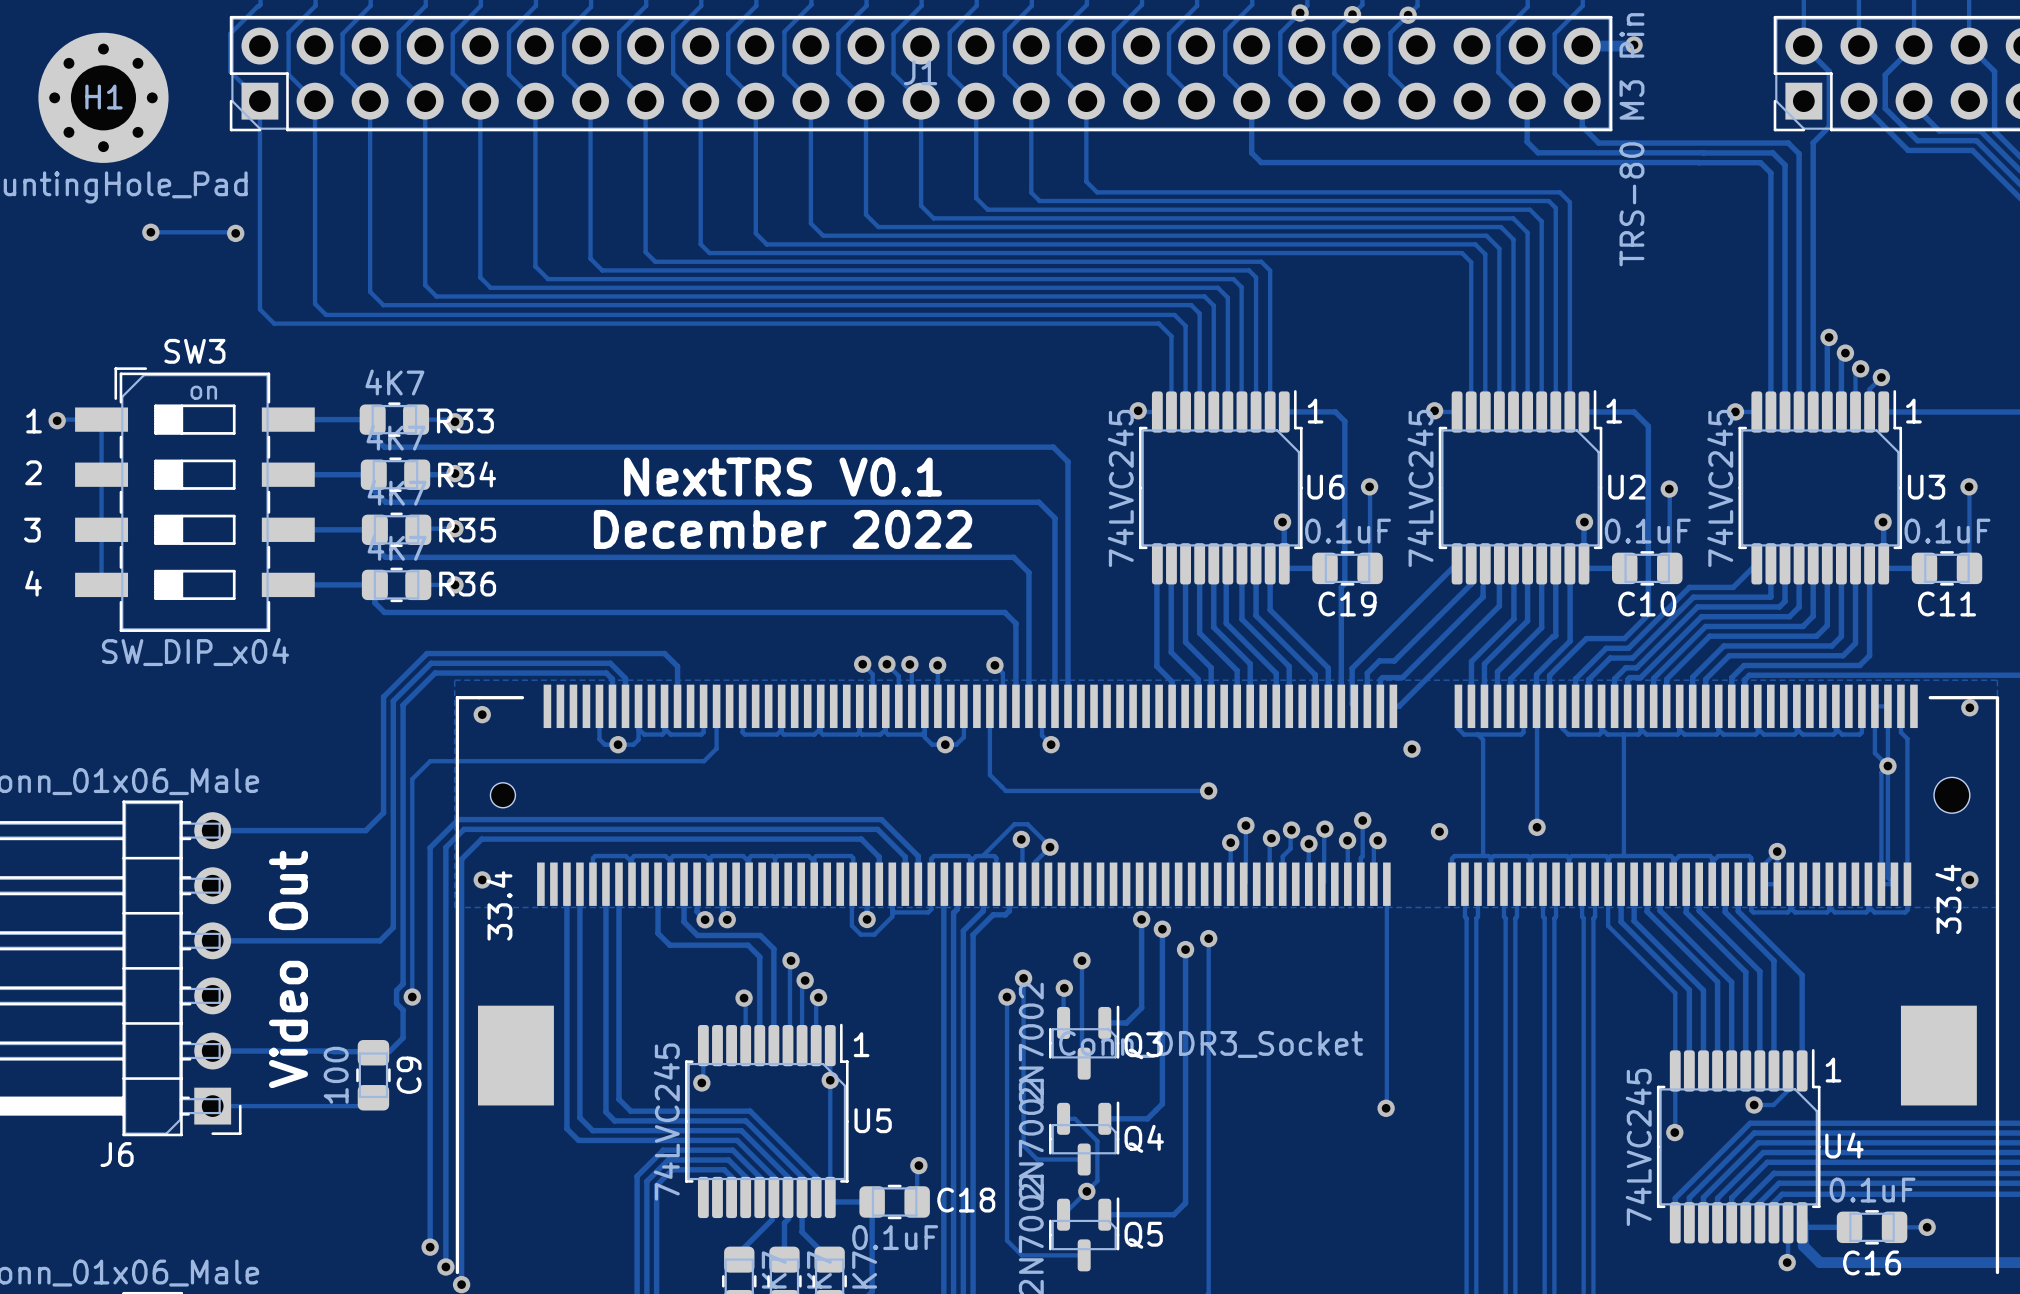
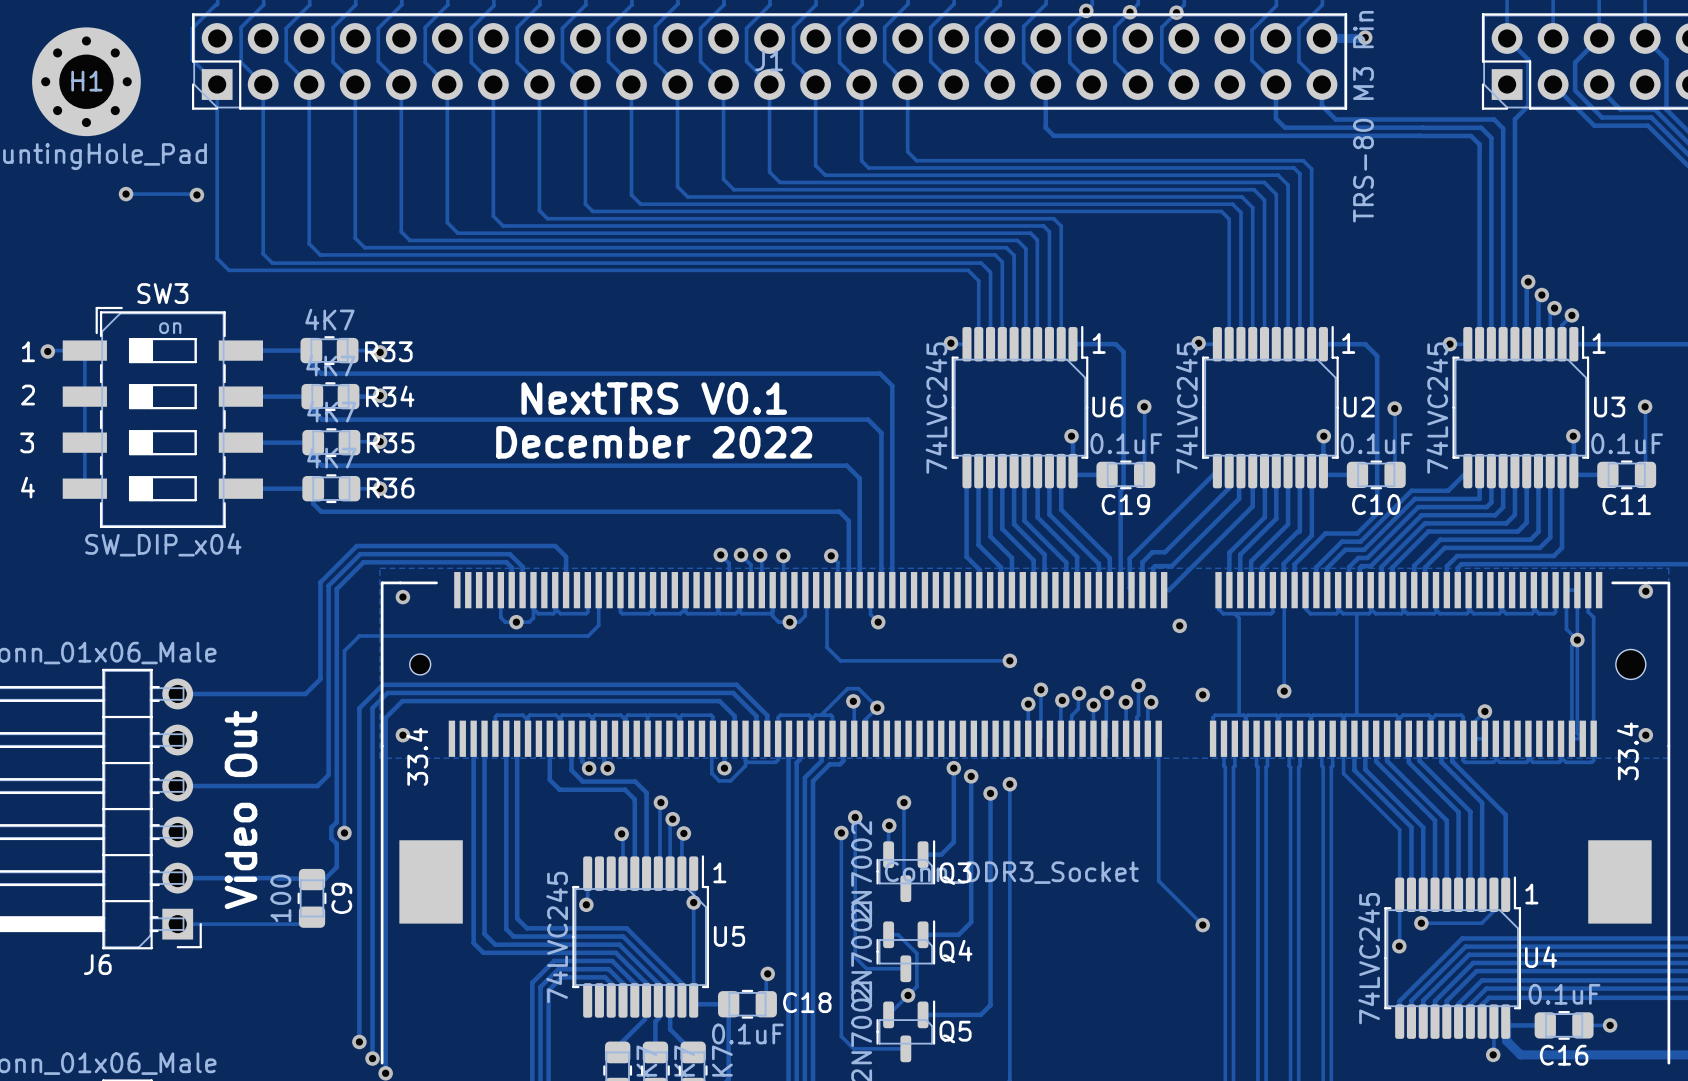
track: (1386, 1054) (1386, 1108) -> (1158, 881) (1202, 925)
track: none -> (1421, 923) (1465, 923)
via position: (1754, 1105) -> (1421, 923)
via position: (1386, 1108) -> (1202, 925)

